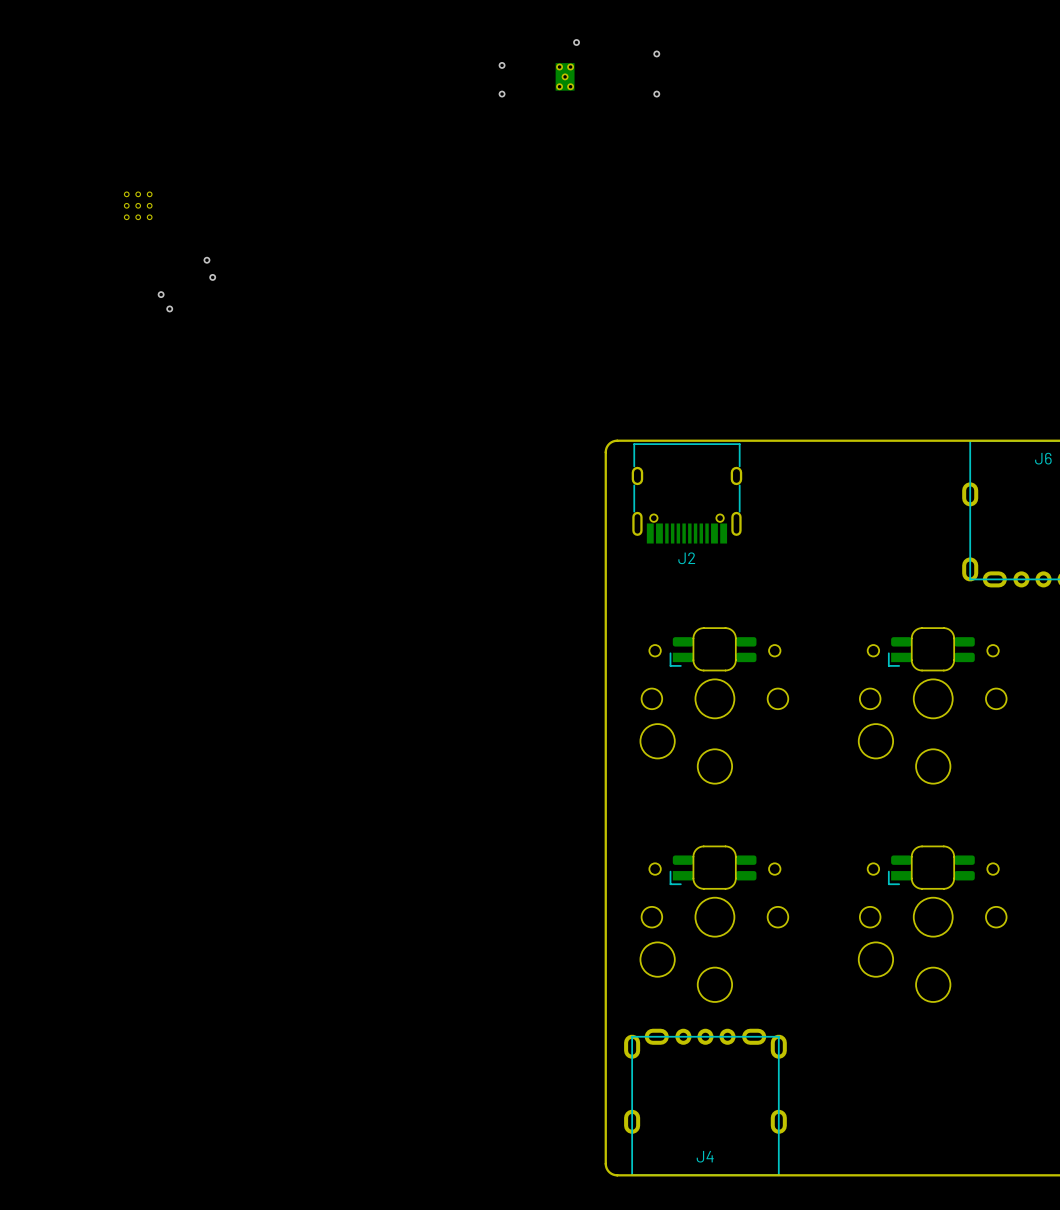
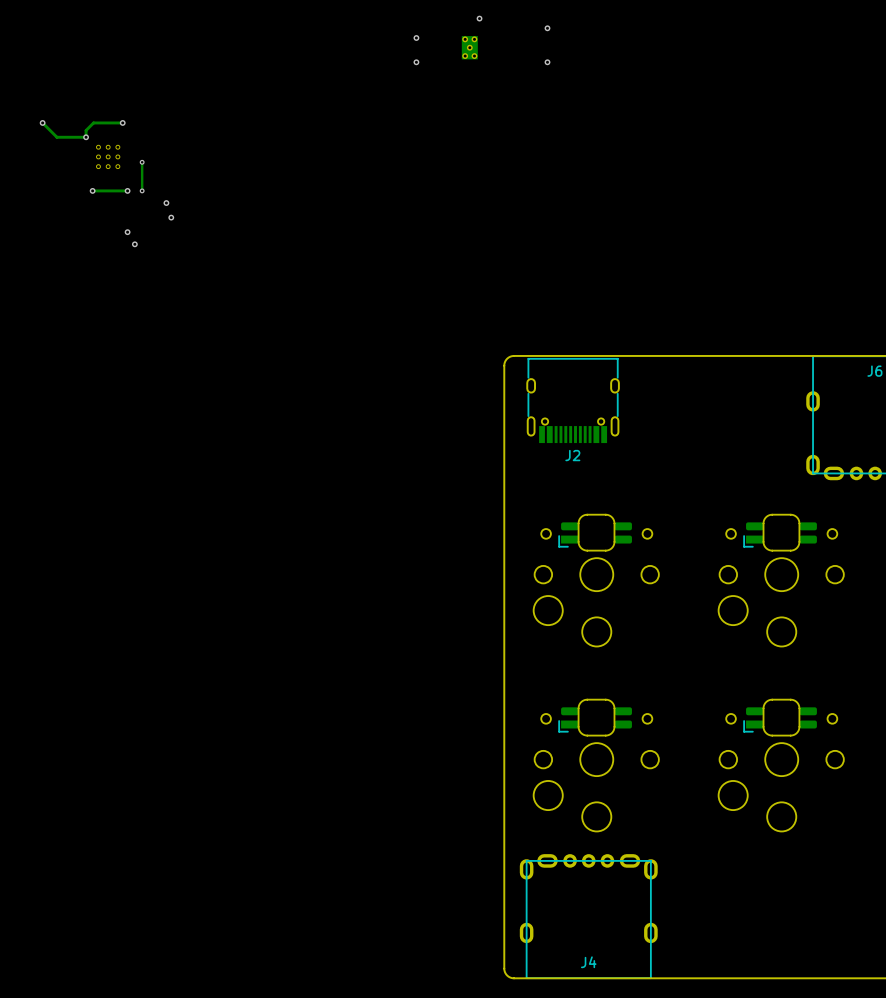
via: none -> (42, 122)
track: none -> (122, 122) (93, 122) (86, 130) (86, 137) (56, 137) (42, 122)
via: none -> (122, 122)
via: none -> (86, 137)
track: none -> (142, 162) (142, 190)
via: none -> (142, 162)
via: none -> (92, 190)
track: none -> (127, 190) (92, 190)
via: none -> (127, 190)
via: none -> (142, 190)

